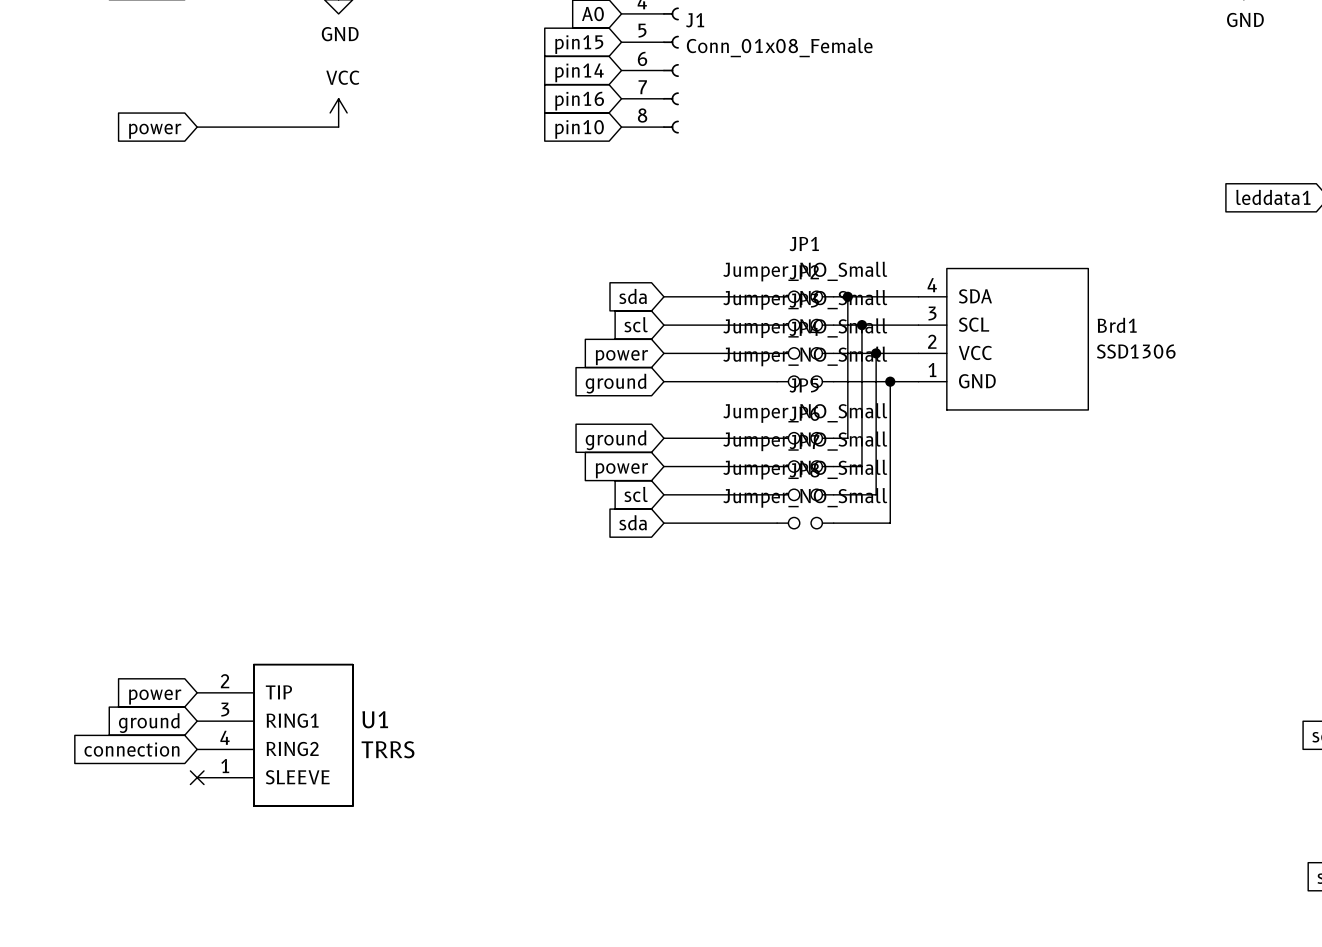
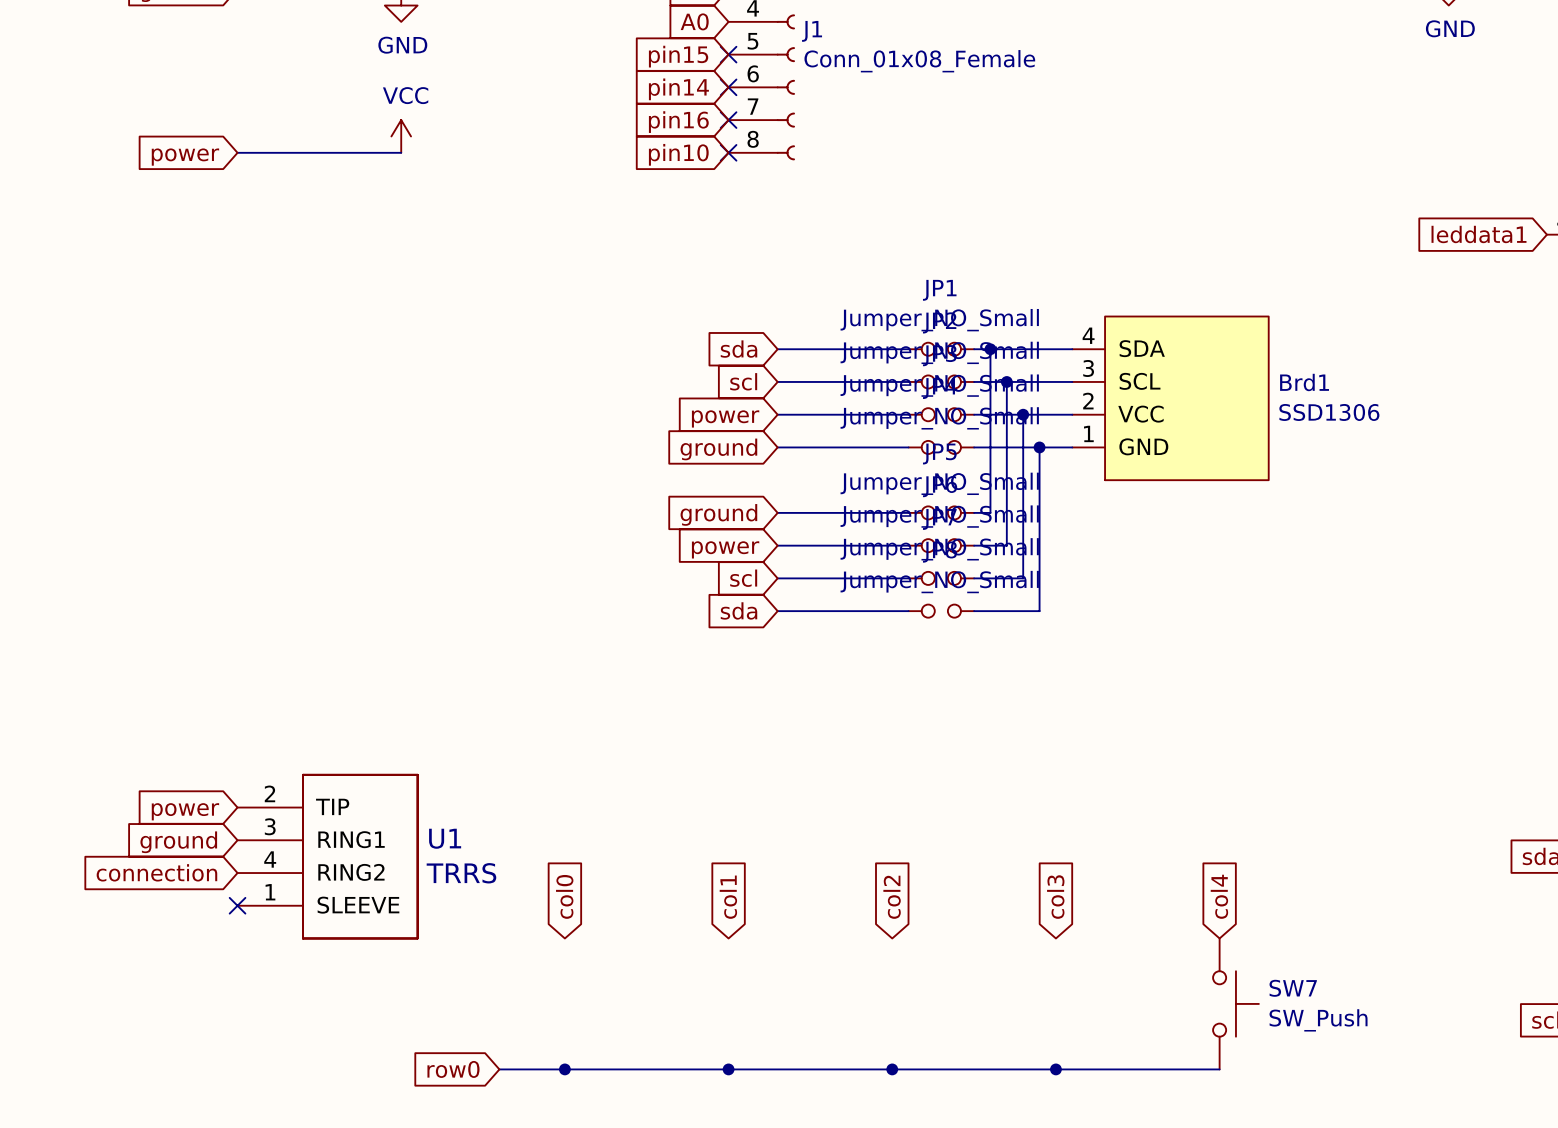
no-connect mark: none -> (728, 54)
no-connect mark: none -> (728, 87)
no-connect mark: none -> (728, 120)
no-connect mark: none -> (728, 152)
global label: none -> col0 (564, 896)
global label: none -> col1 (728, 897)
global label: none -> col2 (892, 897)
global label: none -> col3 (1055, 897)
global label: none -> col4 (1219, 896)
SW7: none -> SW_Push (1235, 1003)
global label: none -> row0 (453, 1069)
wire: none -> (499, 1069) (1219, 1069)
junction: none -> (564, 1069)
junction: none -> (728, 1069)
junction: none -> (892, 1069)
junction: none -> (1055, 1069)

